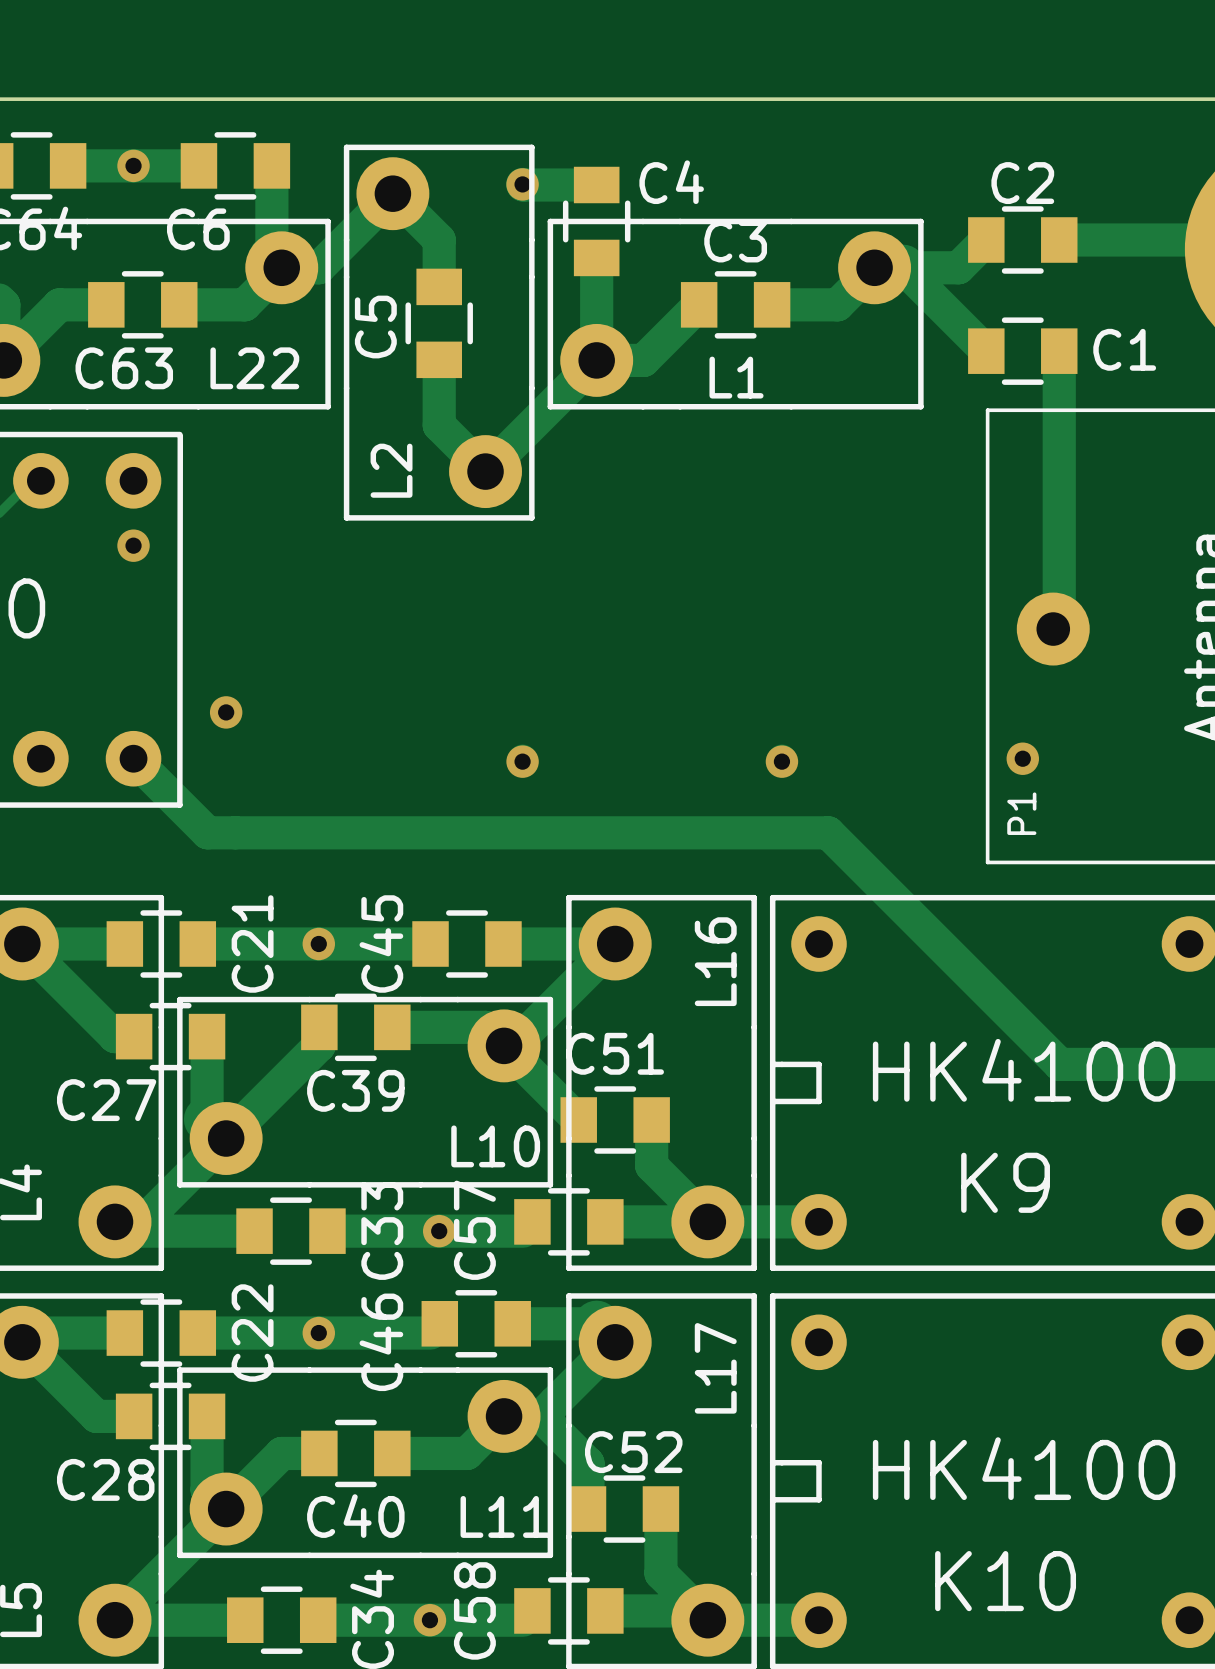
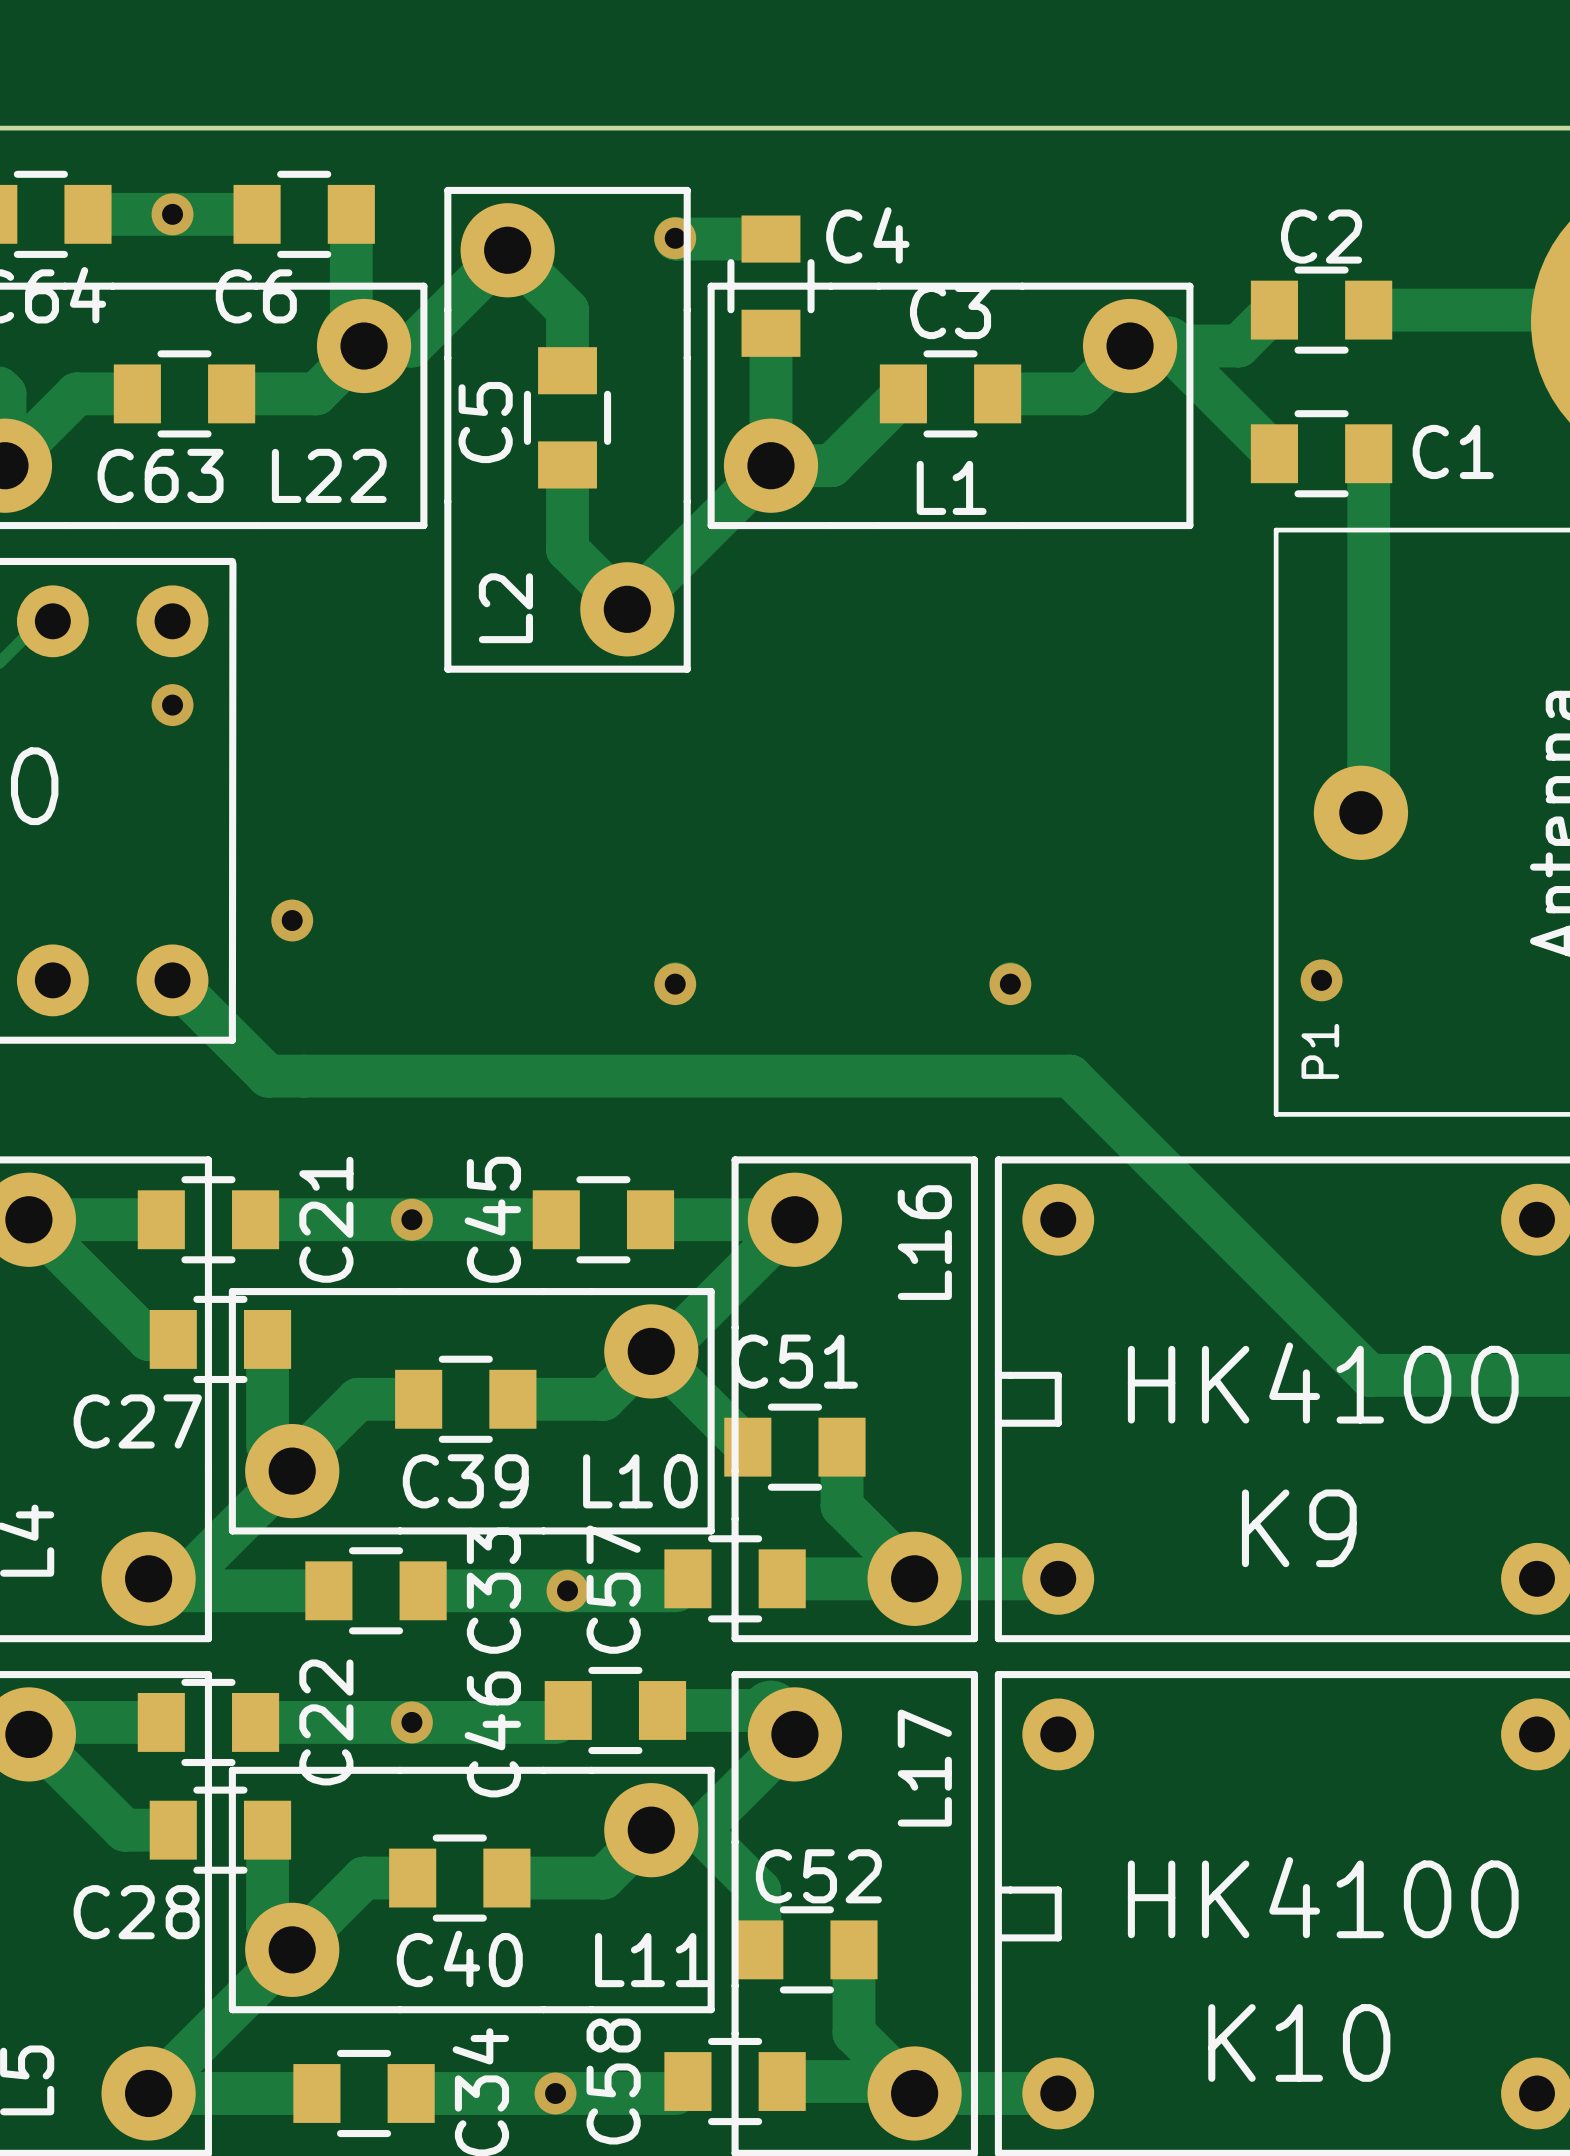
track: (319, 1027) (319, 1045) (226, 1138) (207, 1119) -> none
C39 position: (355, 1027) -> (465, 1399)
track: (392, 1027) (485, 1027) (504, 1045) -> (512, 1399) (603, 1399) (651, 1351)
track: none -> (418, 1399) (358, 1399) (292, 1465) (292, 1471)

